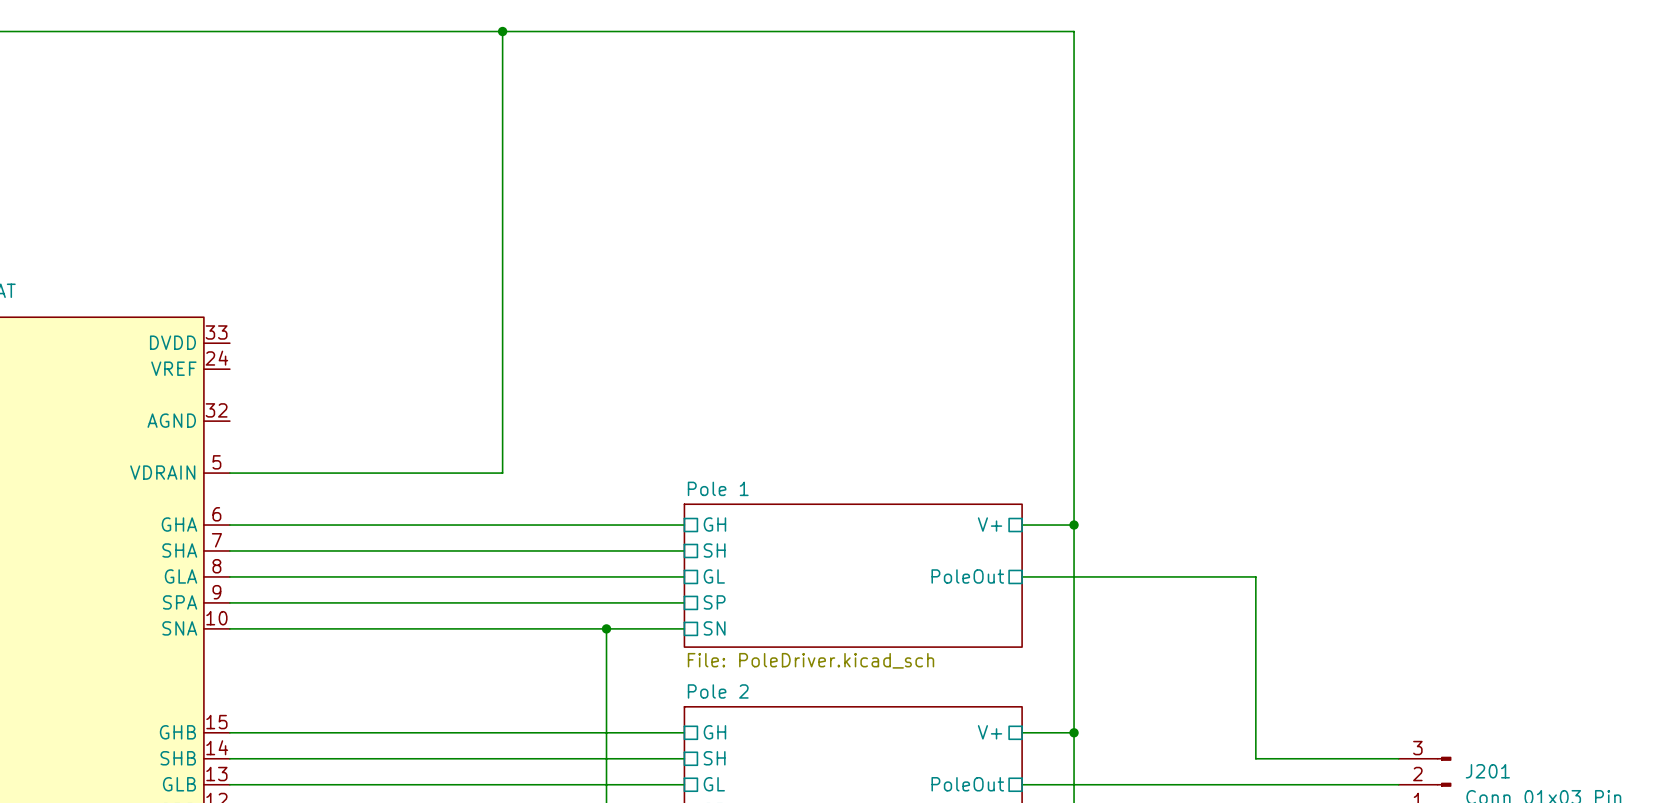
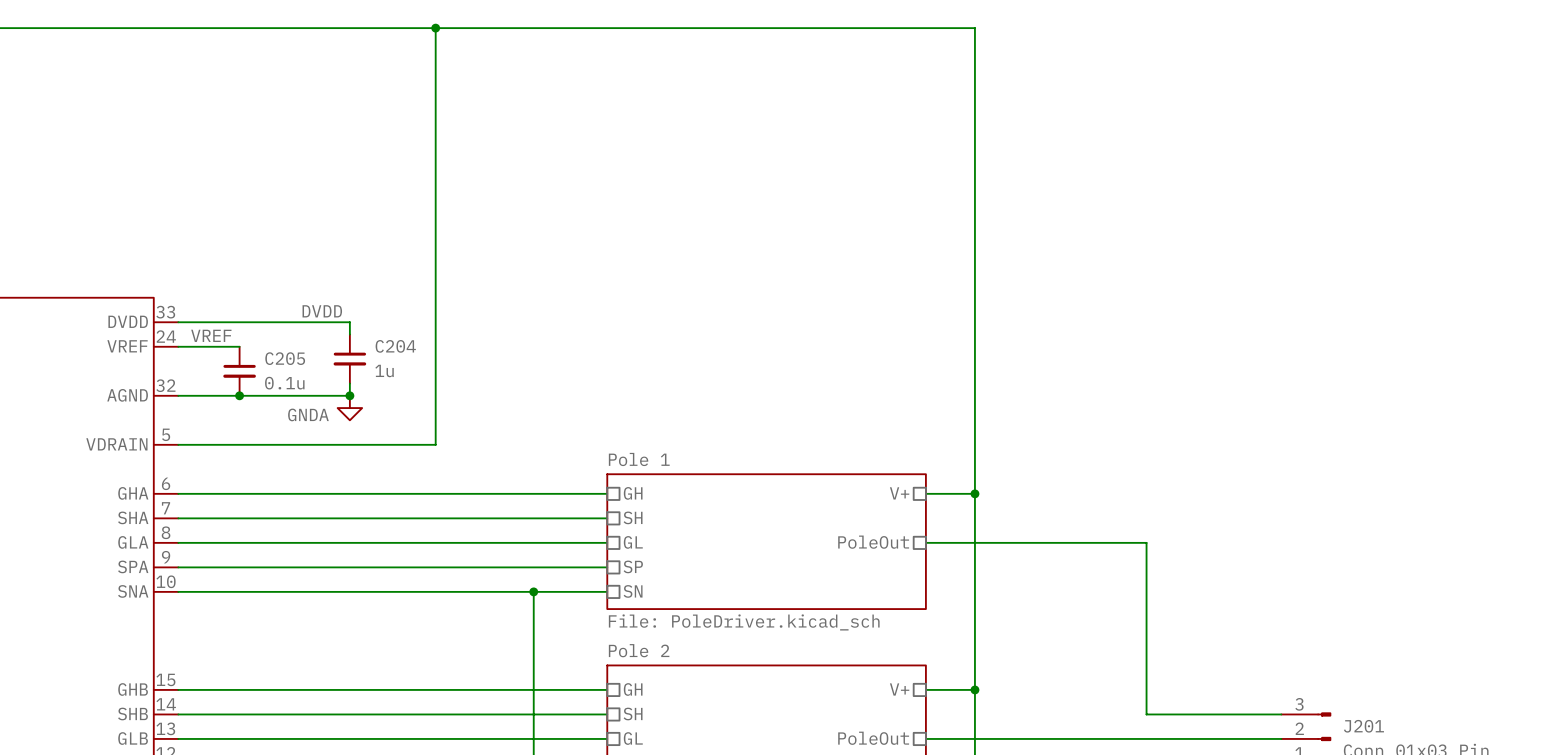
label: none -> DVDD (322, 311)
wire: none -> (178, 322) (349, 322) (349, 334)
label: none -> VREF (211, 335)
wire: none -> (178, 346) (239, 346)
C204: none -> 1u (349, 359)
C205: none -> 0.1u (239, 371)
wire: none -> (349, 383) (349, 395) (178, 395)
junction: none -> (239, 395)
junction: none -> (349, 395)
power symbol: none -> GNDA (349, 408)

